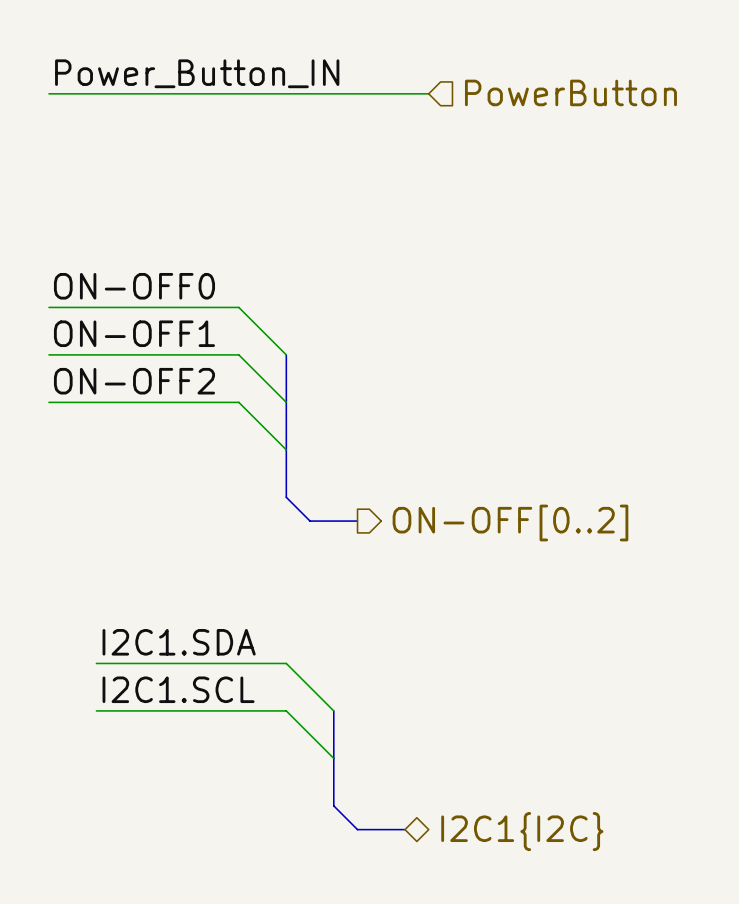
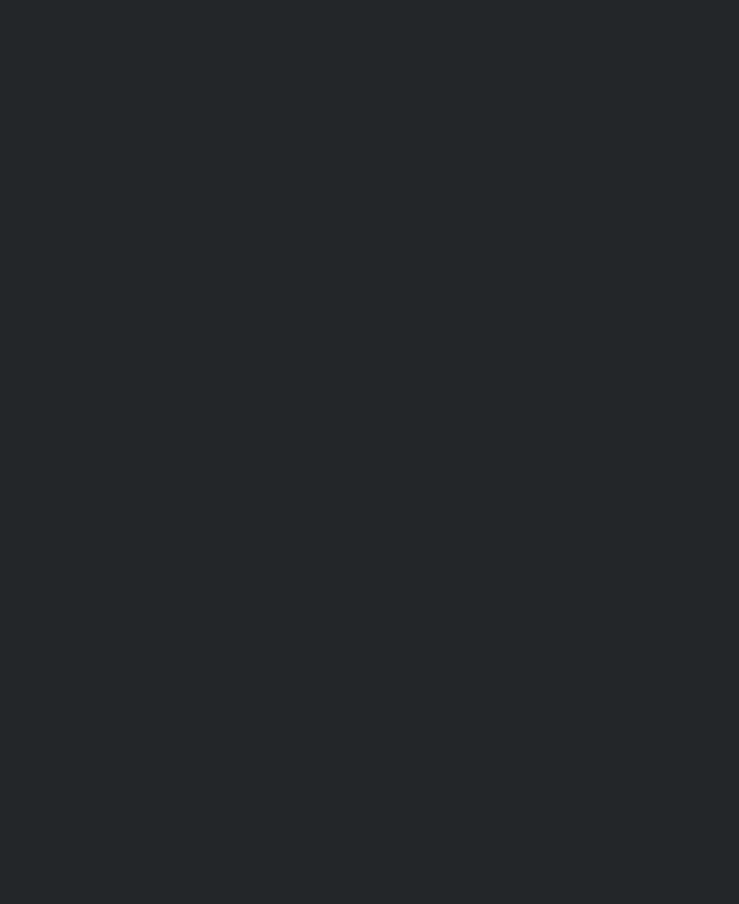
label: Power_Button_IN (197, 73) -> none
hierarchical label: PowerButton (570, 92) -> none
wire: (48, 93) (428, 93) -> none
label: ON-OFF0 (134, 286) -> none
wire: (48, 307) (238, 307) (286, 354) -> none
label: ON-OFF1 (134, 333) -> none
wire: (48, 354) (238, 354) (286, 402) -> none
bus: (286, 354) (286, 497) (310, 521) (357, 521) -> none
label: ON-OFF2 (134, 381) -> none
wire: (48, 402) (238, 402) (286, 449) -> none
hierarchical label: ON-OFF[0..2] (510, 523) -> none
label: I2C1.SDA (179, 642) -> none
wire: (96, 663) (286, 663) (333, 710) -> none
label: I2C1.SCL (178, 689) -> none
wire: (96, 710) (286, 710) (333, 758) -> none
bus: (333, 710) (333, 805) (357, 829) (404, 829) -> none
hierarchical label: I2C1{I2C} (522, 831) -> none

